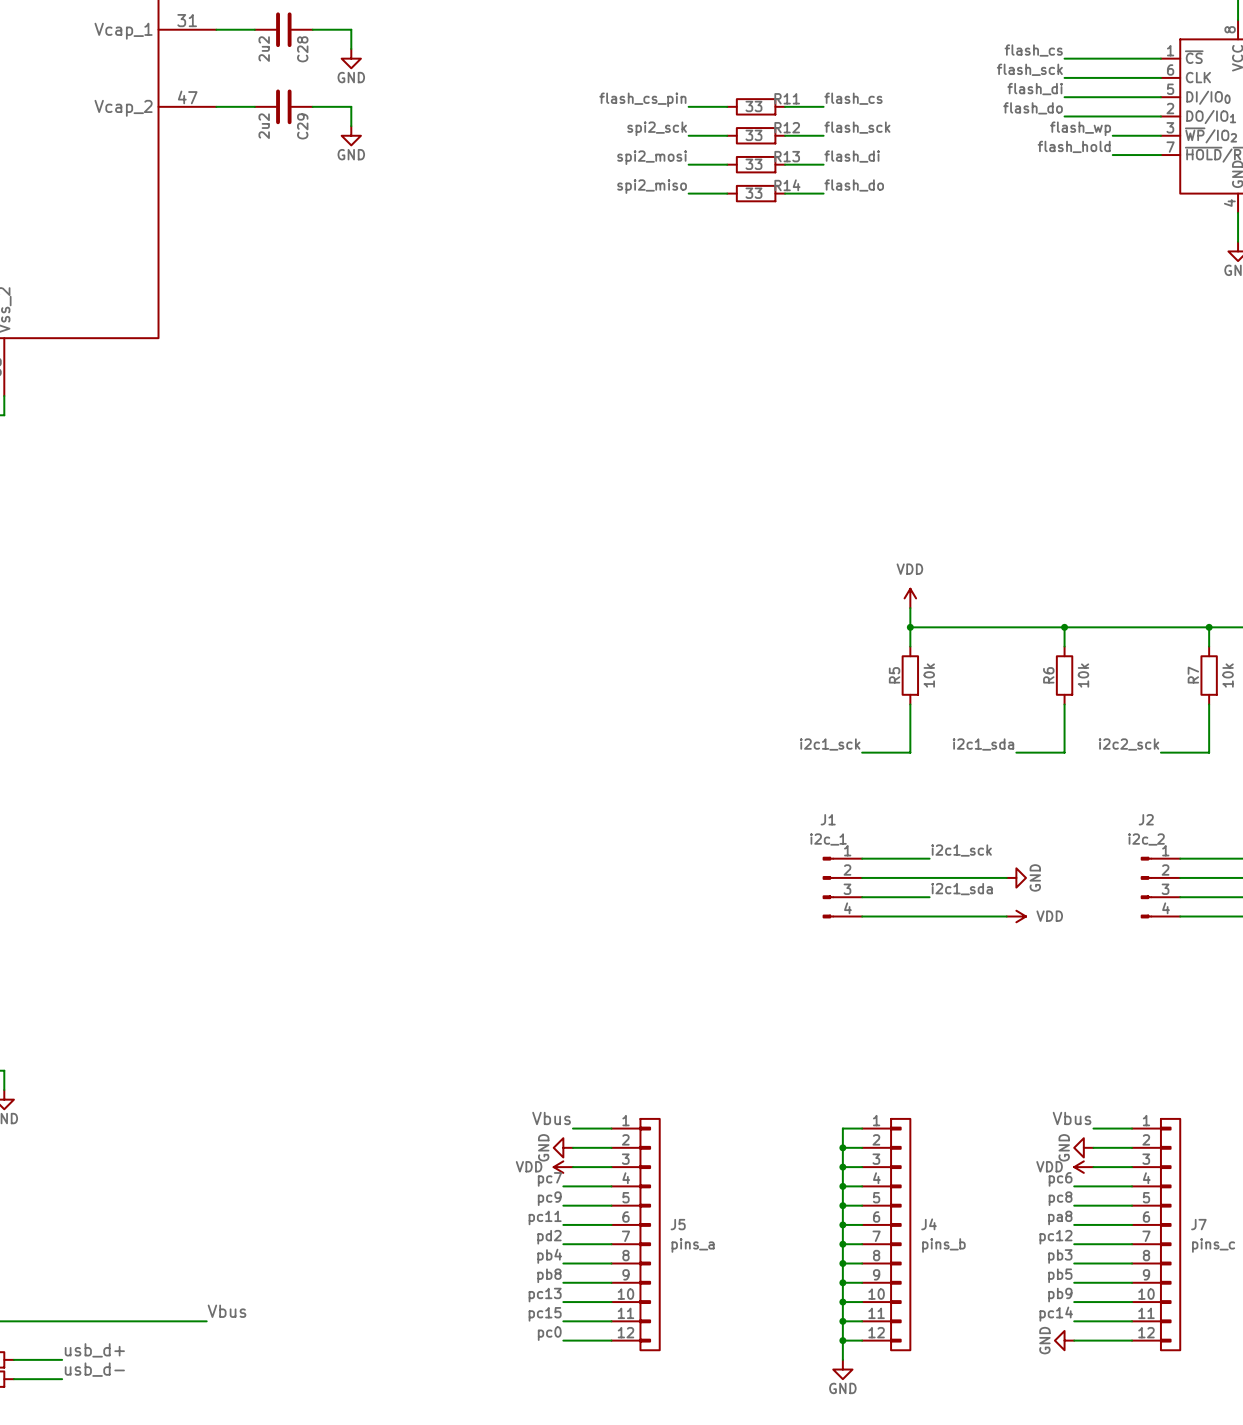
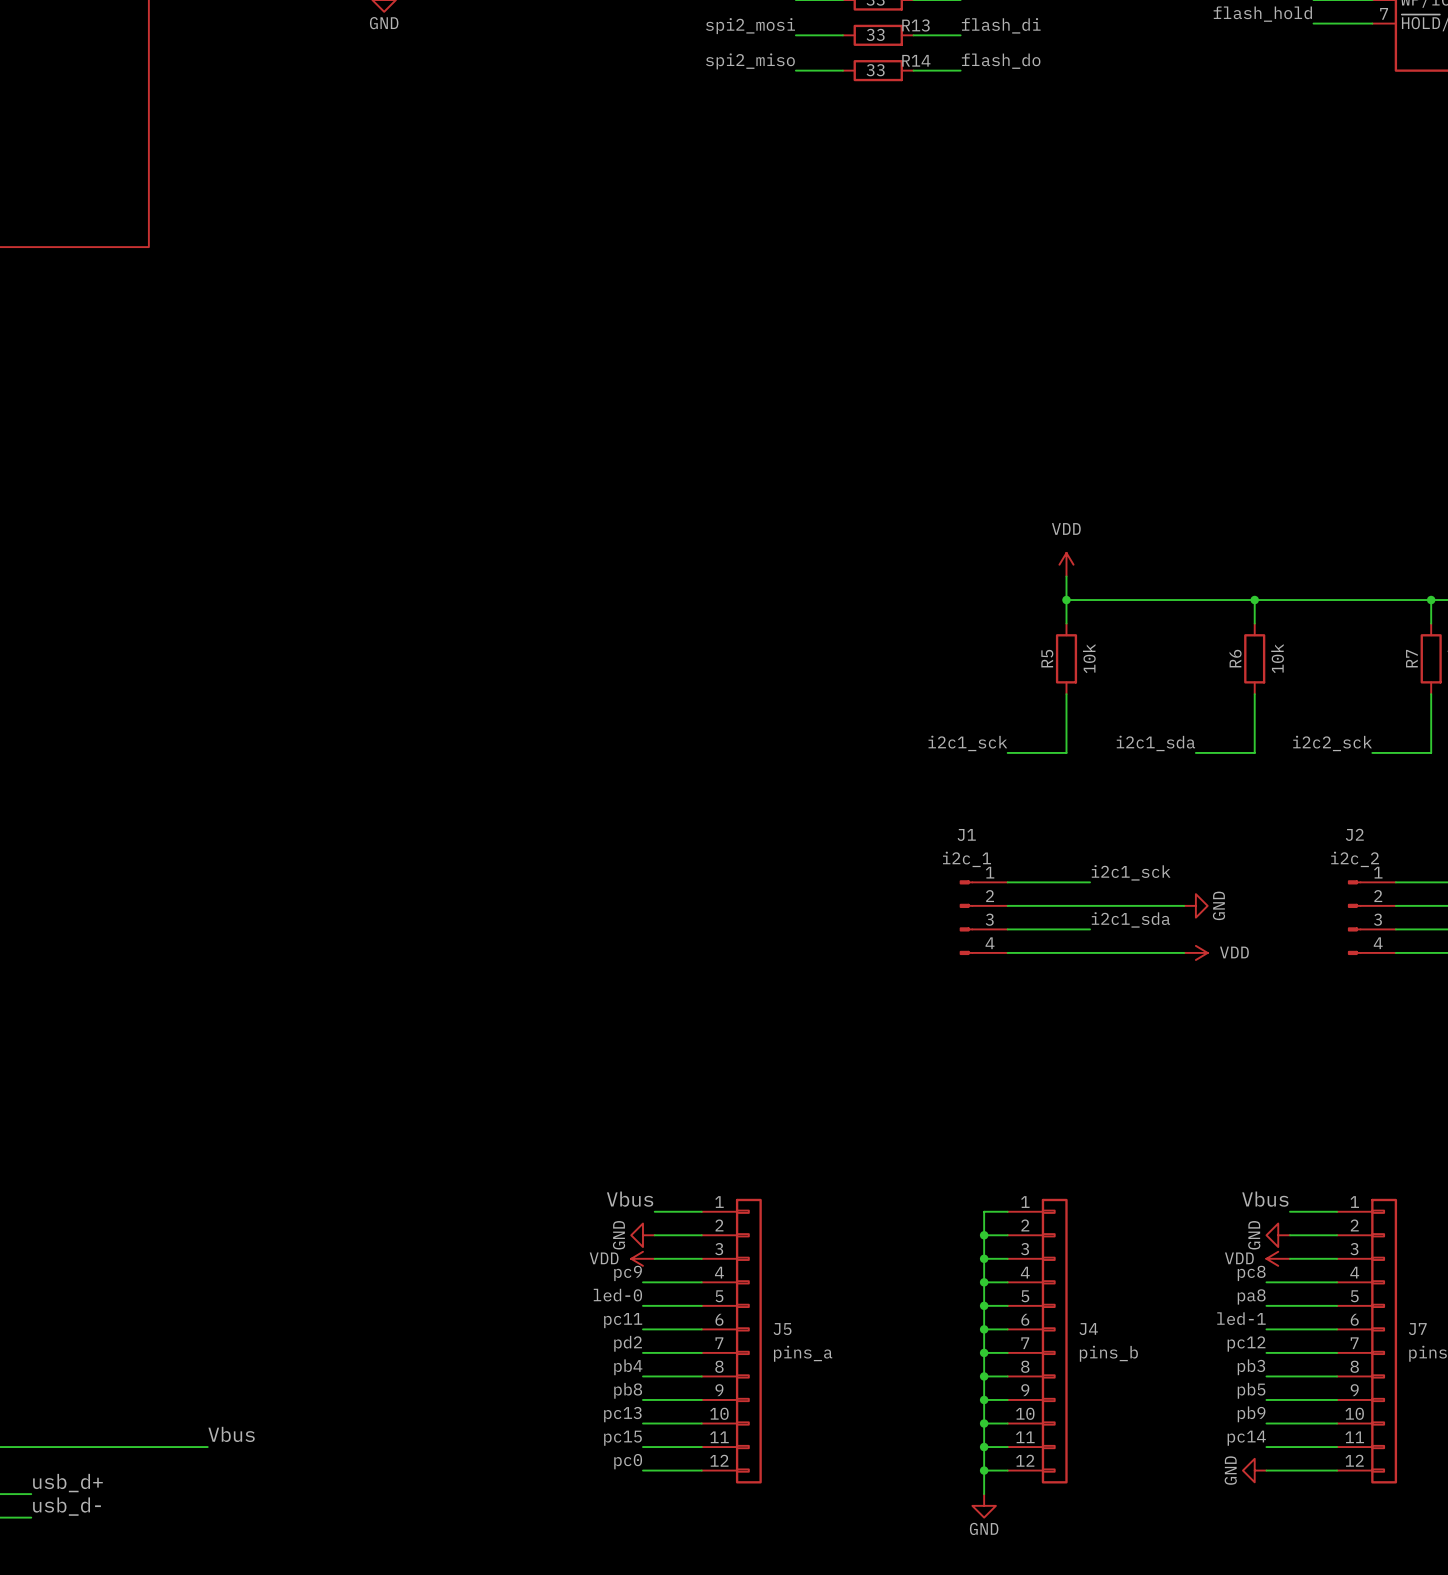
label: pc7 (549, 1179) -> pc9 (628, 1273)
label: pc6 (1060, 1179) -> pc8 (1251, 1273)
label: pc9 (549, 1198) -> led-0 (617, 1295)
label: pc8 (1060, 1198) -> pa8 (1251, 1296)
label: pa8 (1060, 1217) -> led-1 (1241, 1318)

